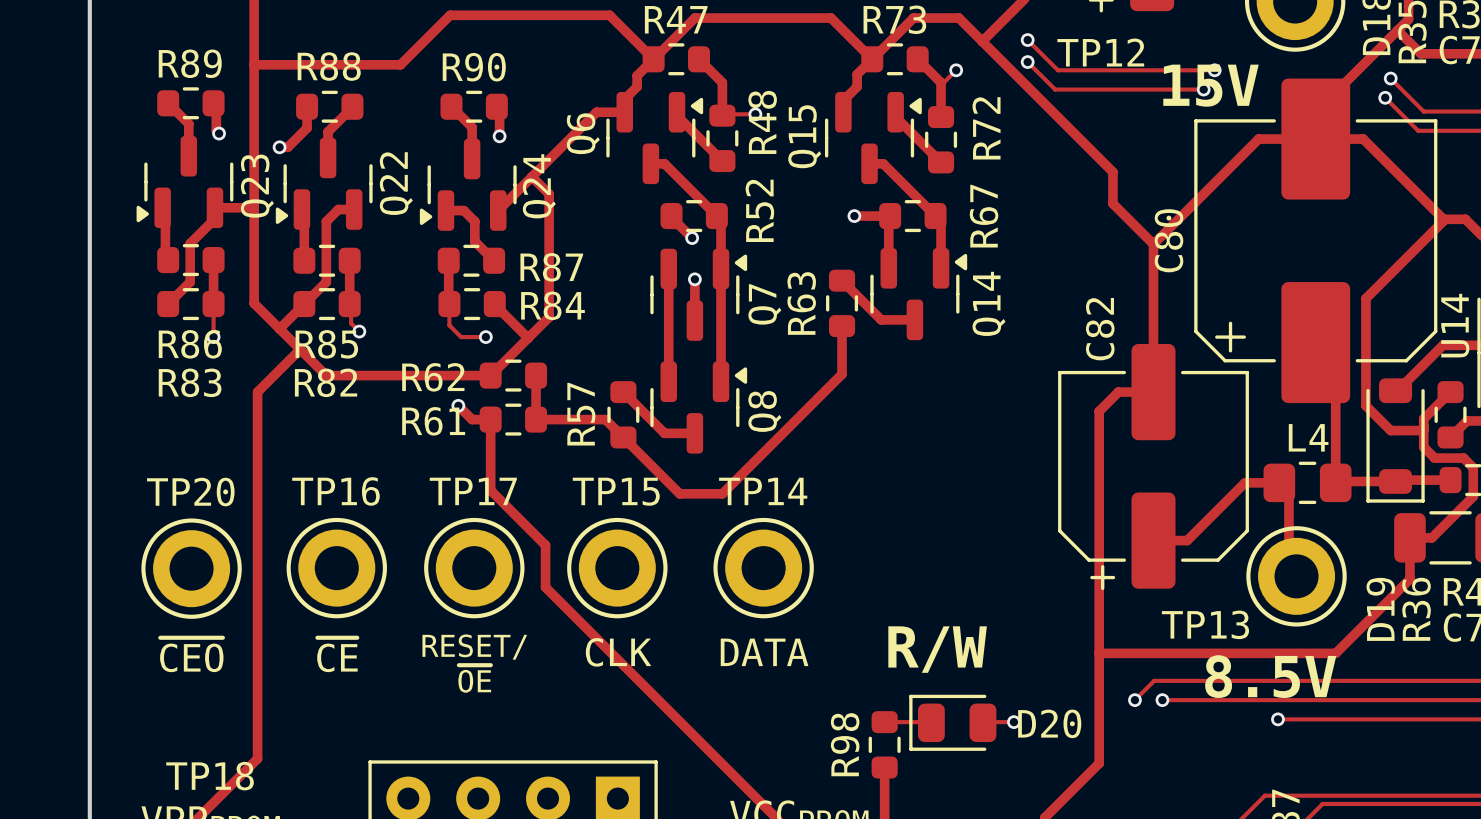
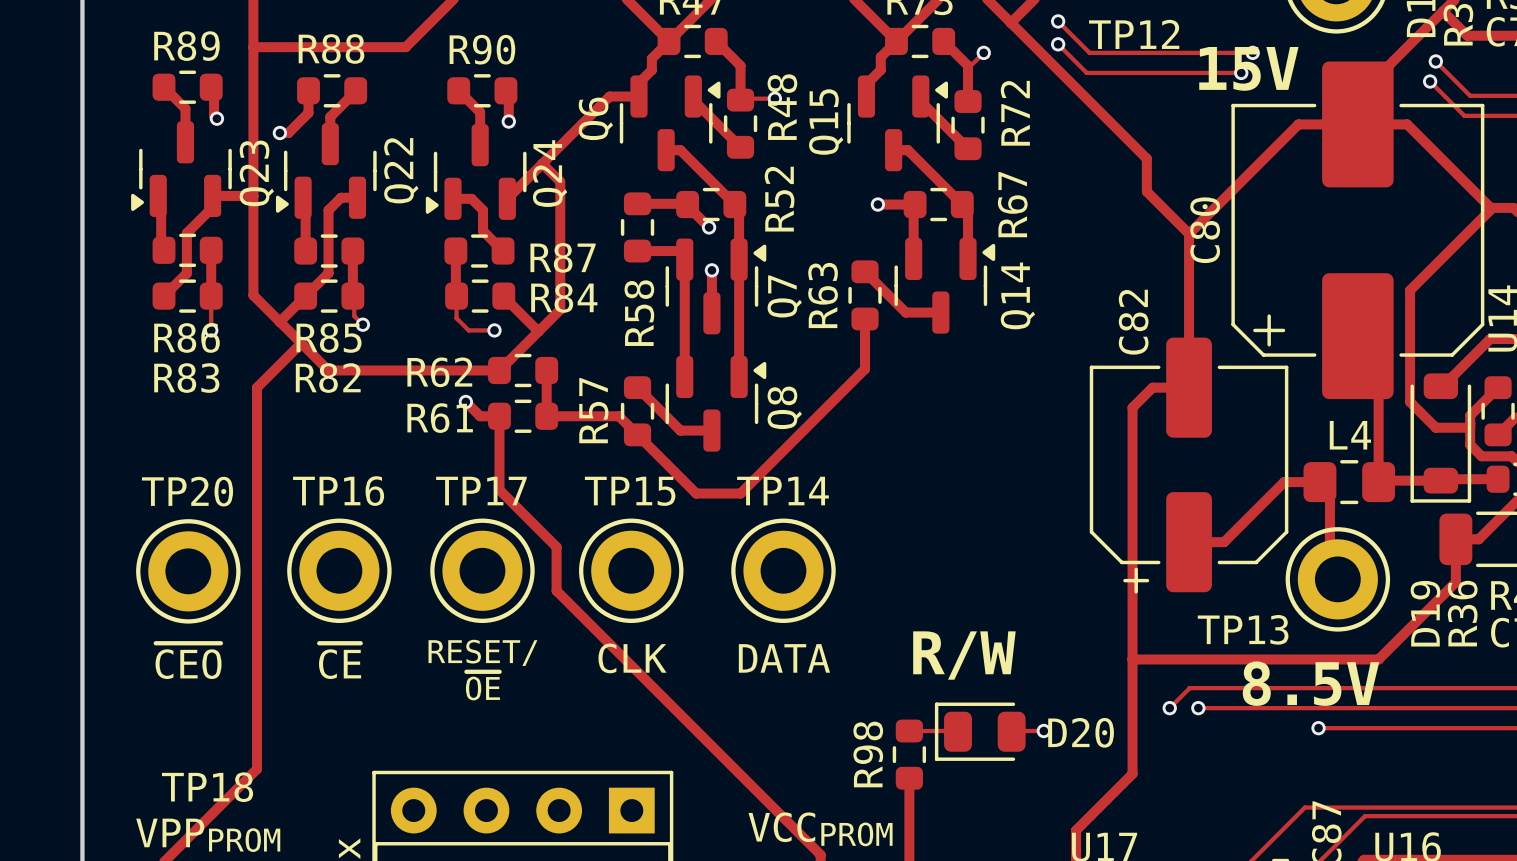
track: none -> (637, 203) (687, 204)
R58: none -> (637, 227)
track: none -> (637, 251) (681, 251) (683, 253)

